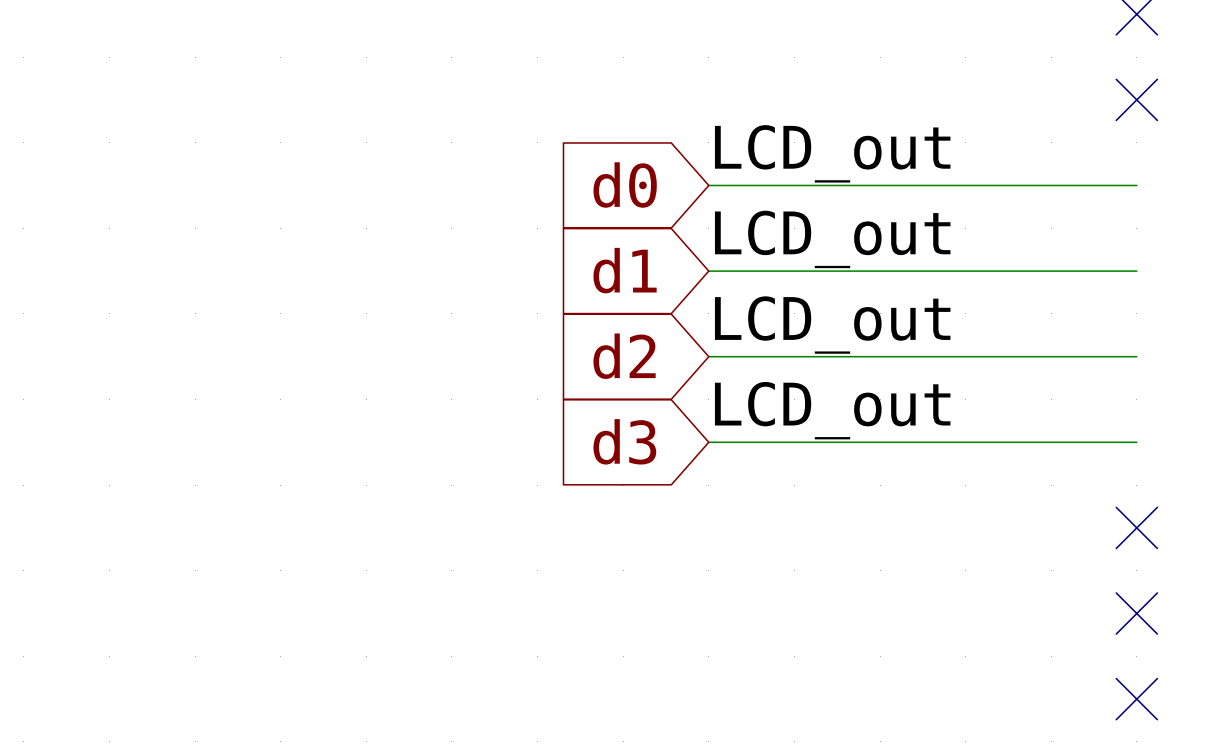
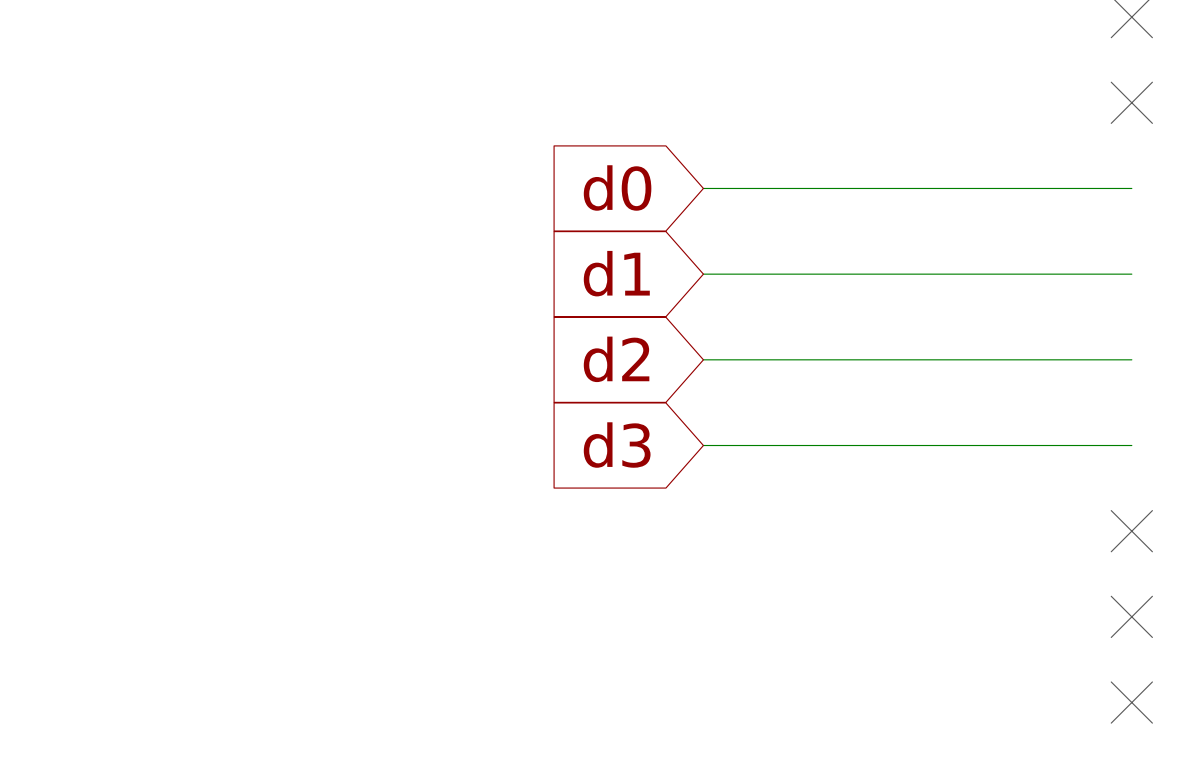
label: LCD_out (832, 153) -> none
label: LCD_out (832, 239) -> none
label: LCD_out (832, 325) -> none
label: LCD_out (832, 410) -> none

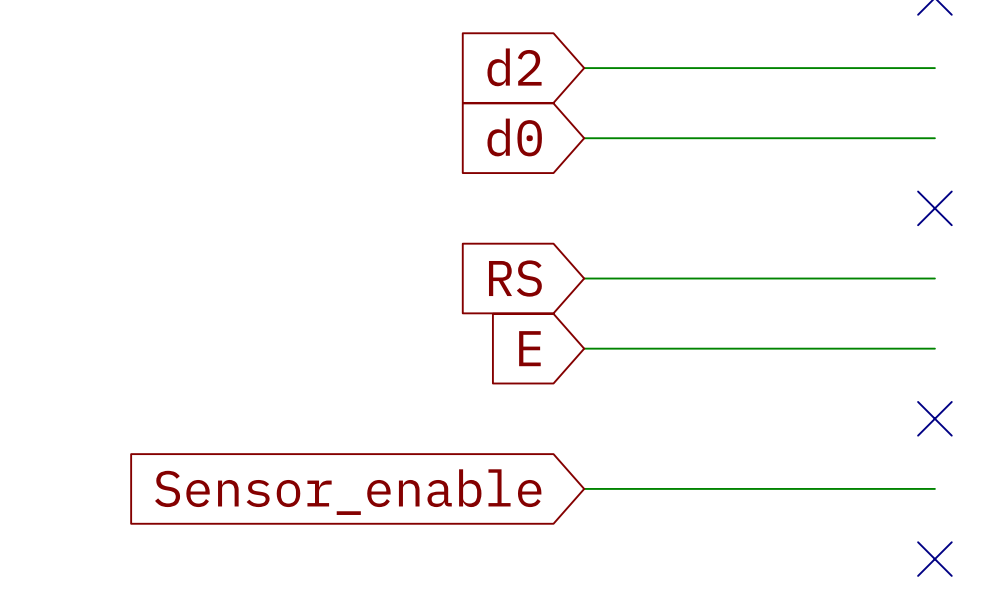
global label: none -> d2 (514, 67)
no-connect mark: (1131, 102) -> none
global label: d1 (616, 273) -> none
wire: (703, 274) (1131, 274) -> (584, 68) (934, 68)
no-connect mark: none -> (934, 208)
global label: d2 (616, 359) -> RS (515, 278)
global label: d3 (617, 445) -> E (529, 348)
wire: none -> (584, 488) (934, 488)
no-connect mark: (1131, 616) -> none
global label: none -> Sensor_enable (348, 492)

